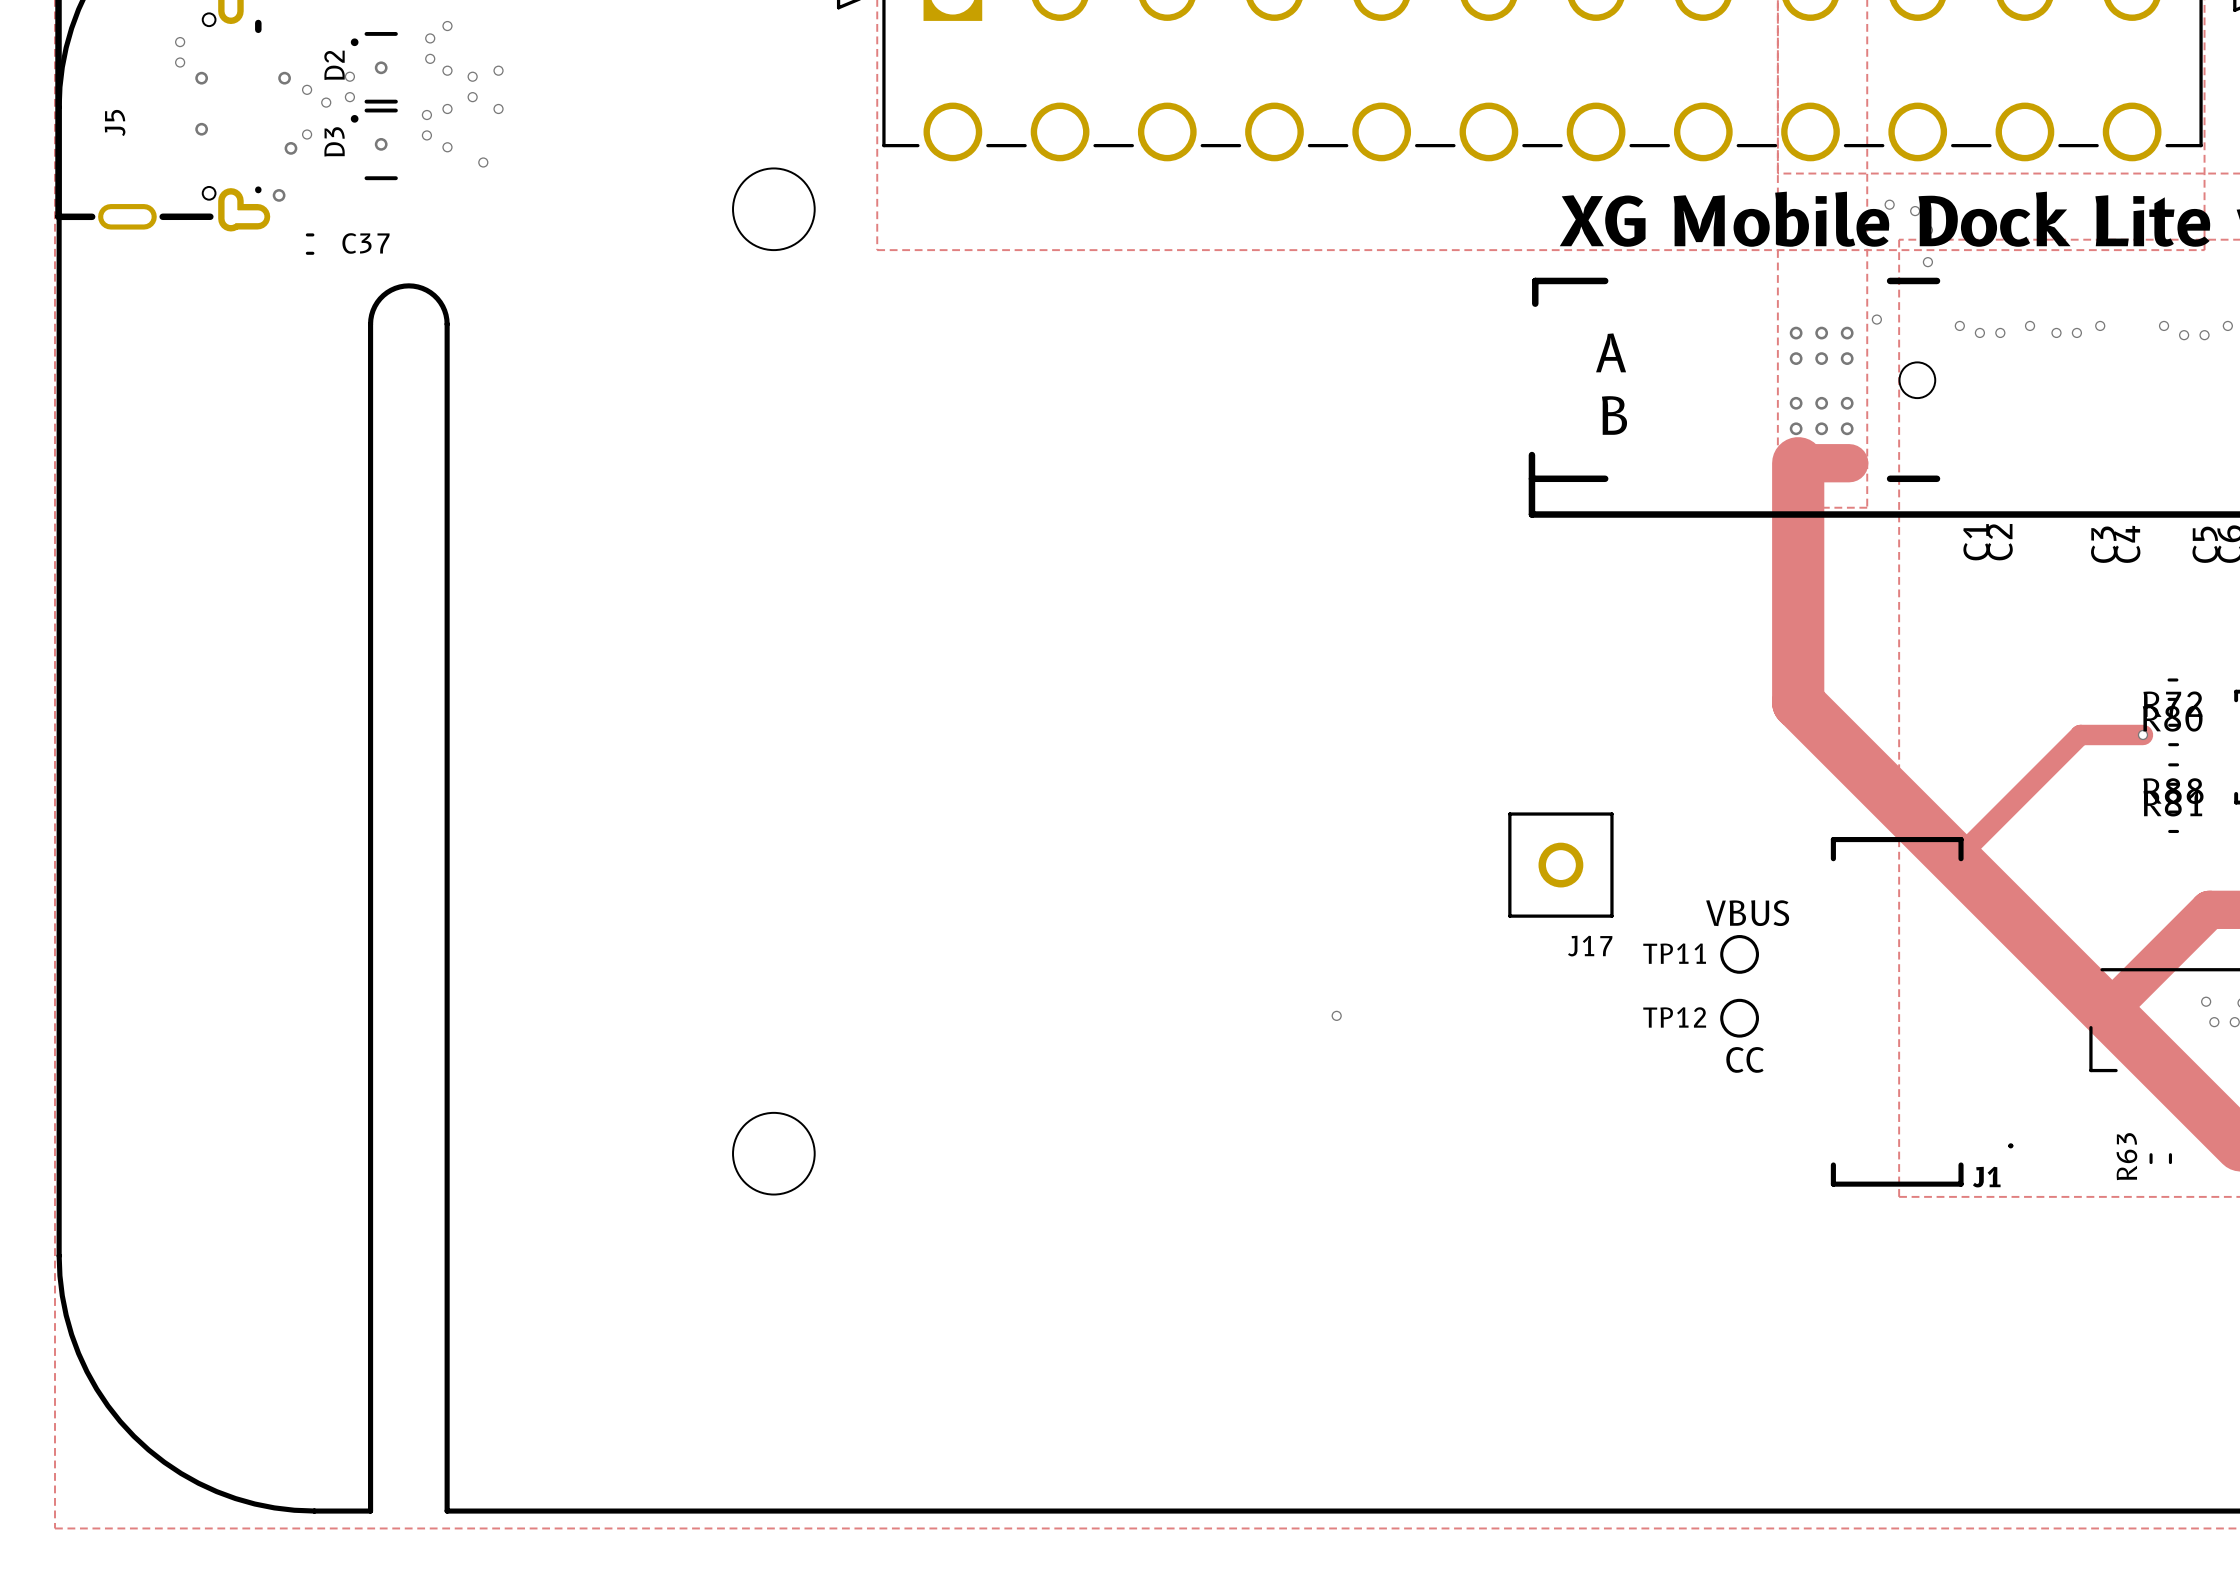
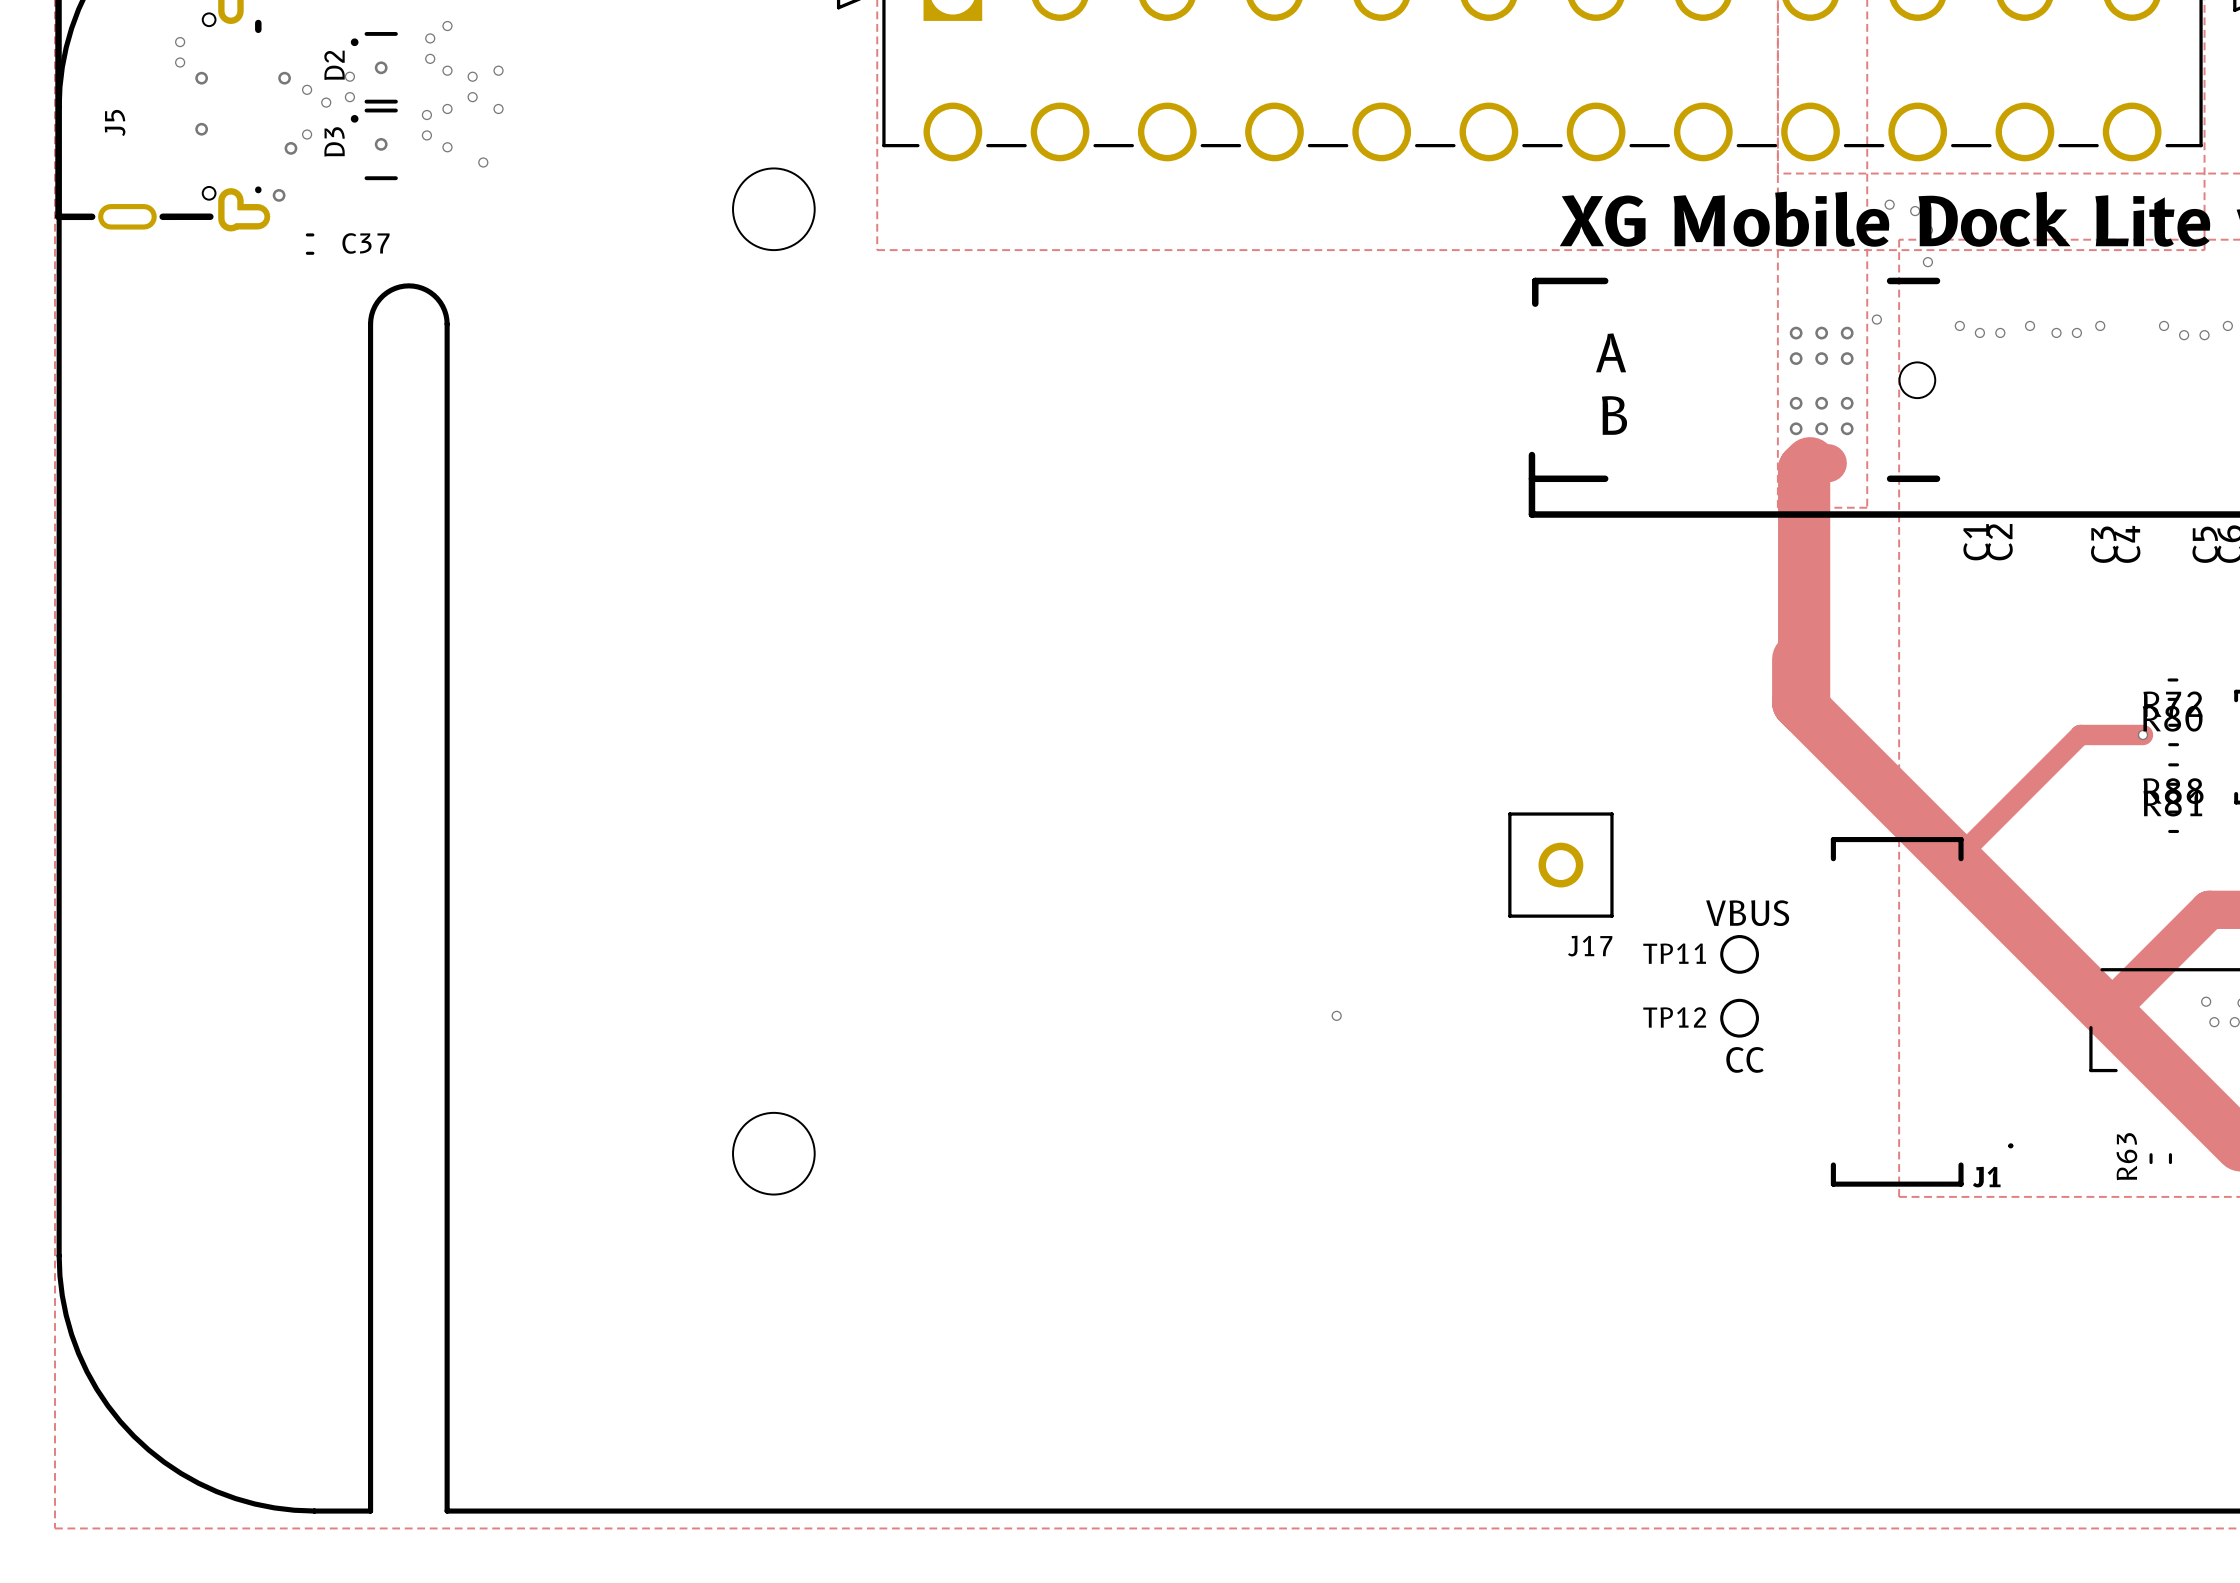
track: (1810, 463) (1798, 463) (1798, 659) -> (1810, 463) (1804, 469) (1804, 708)
track: (1827, 463) (1849, 463) -> none

